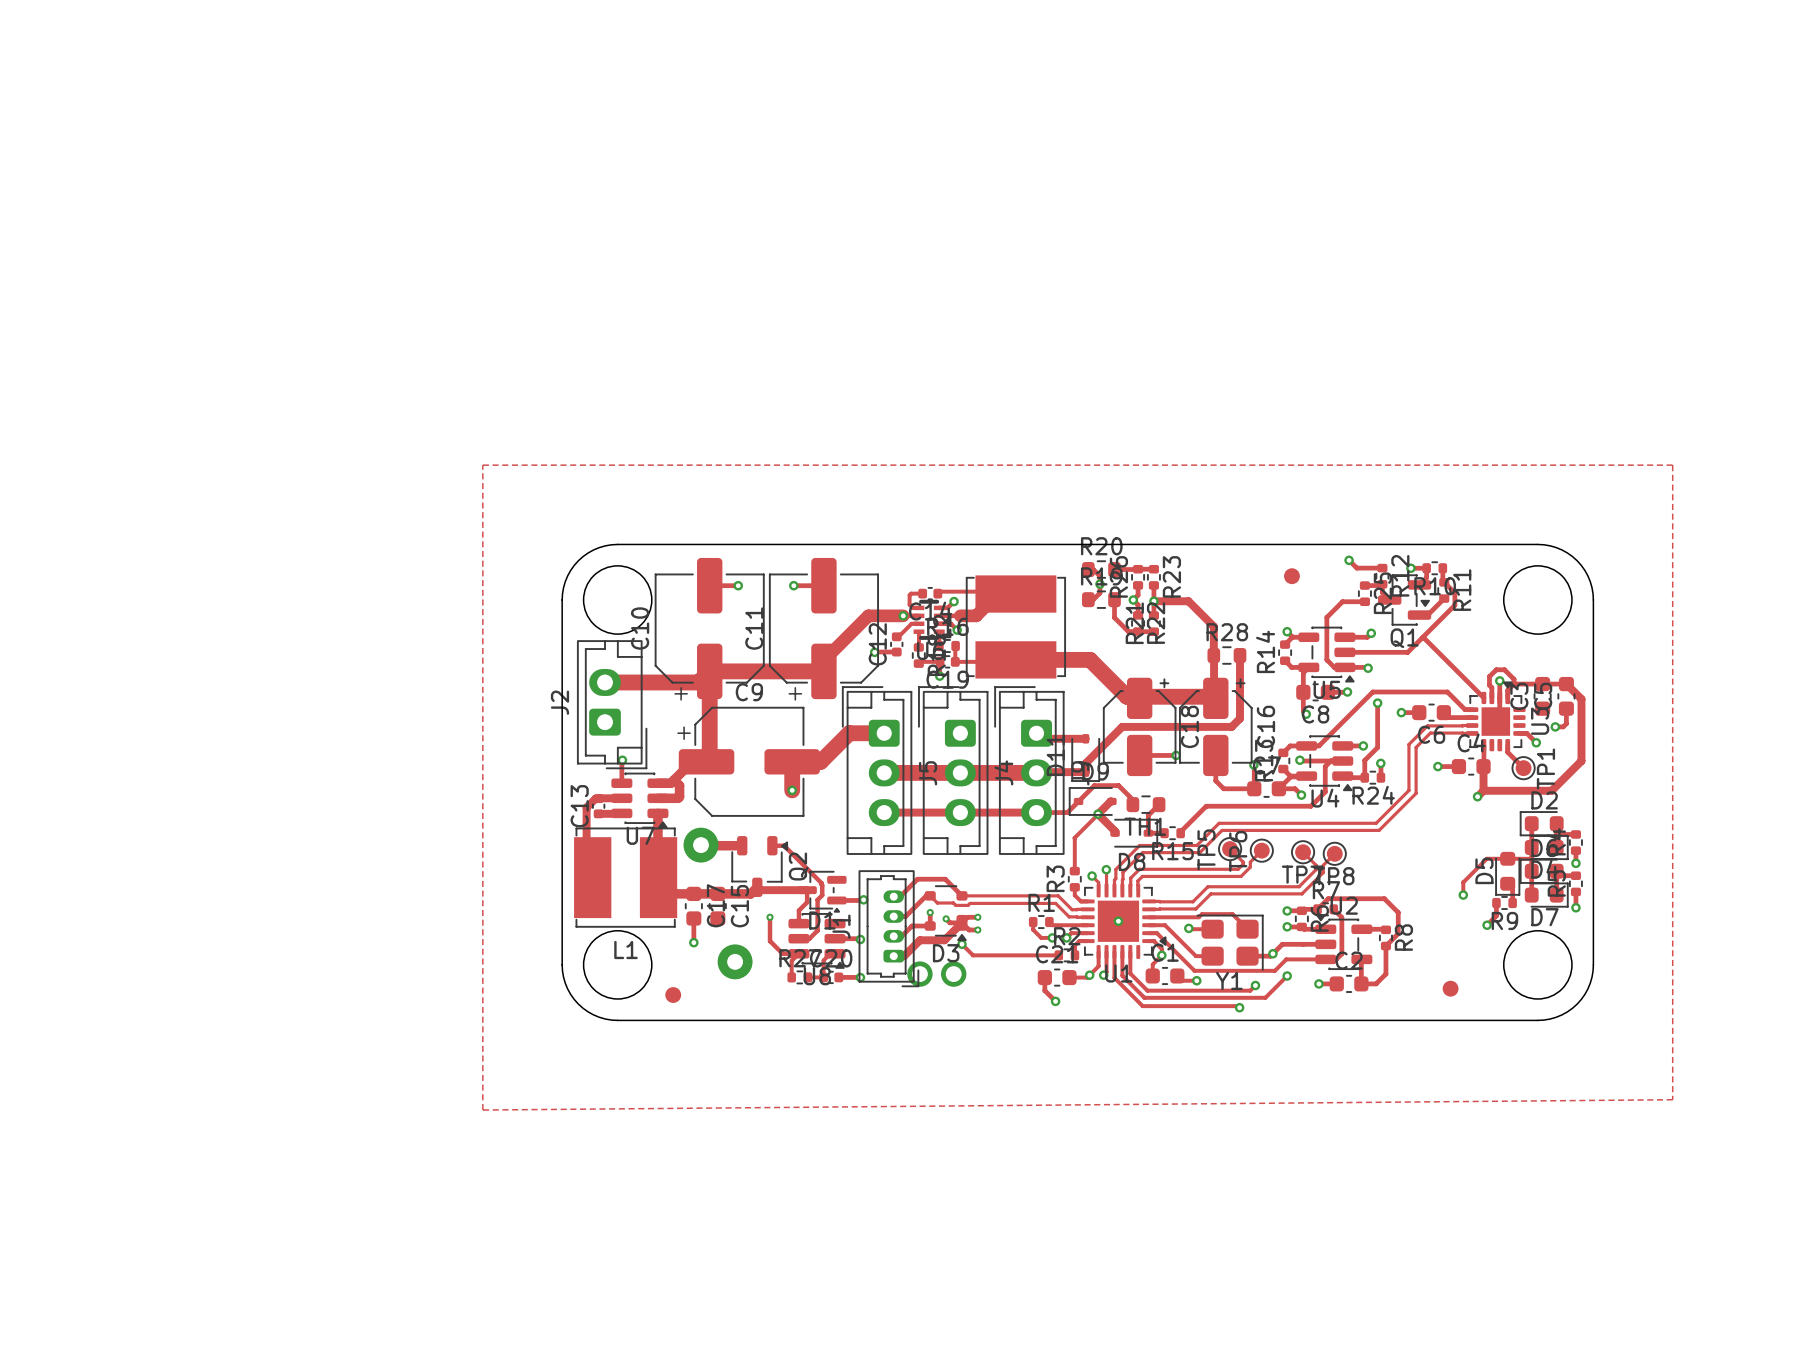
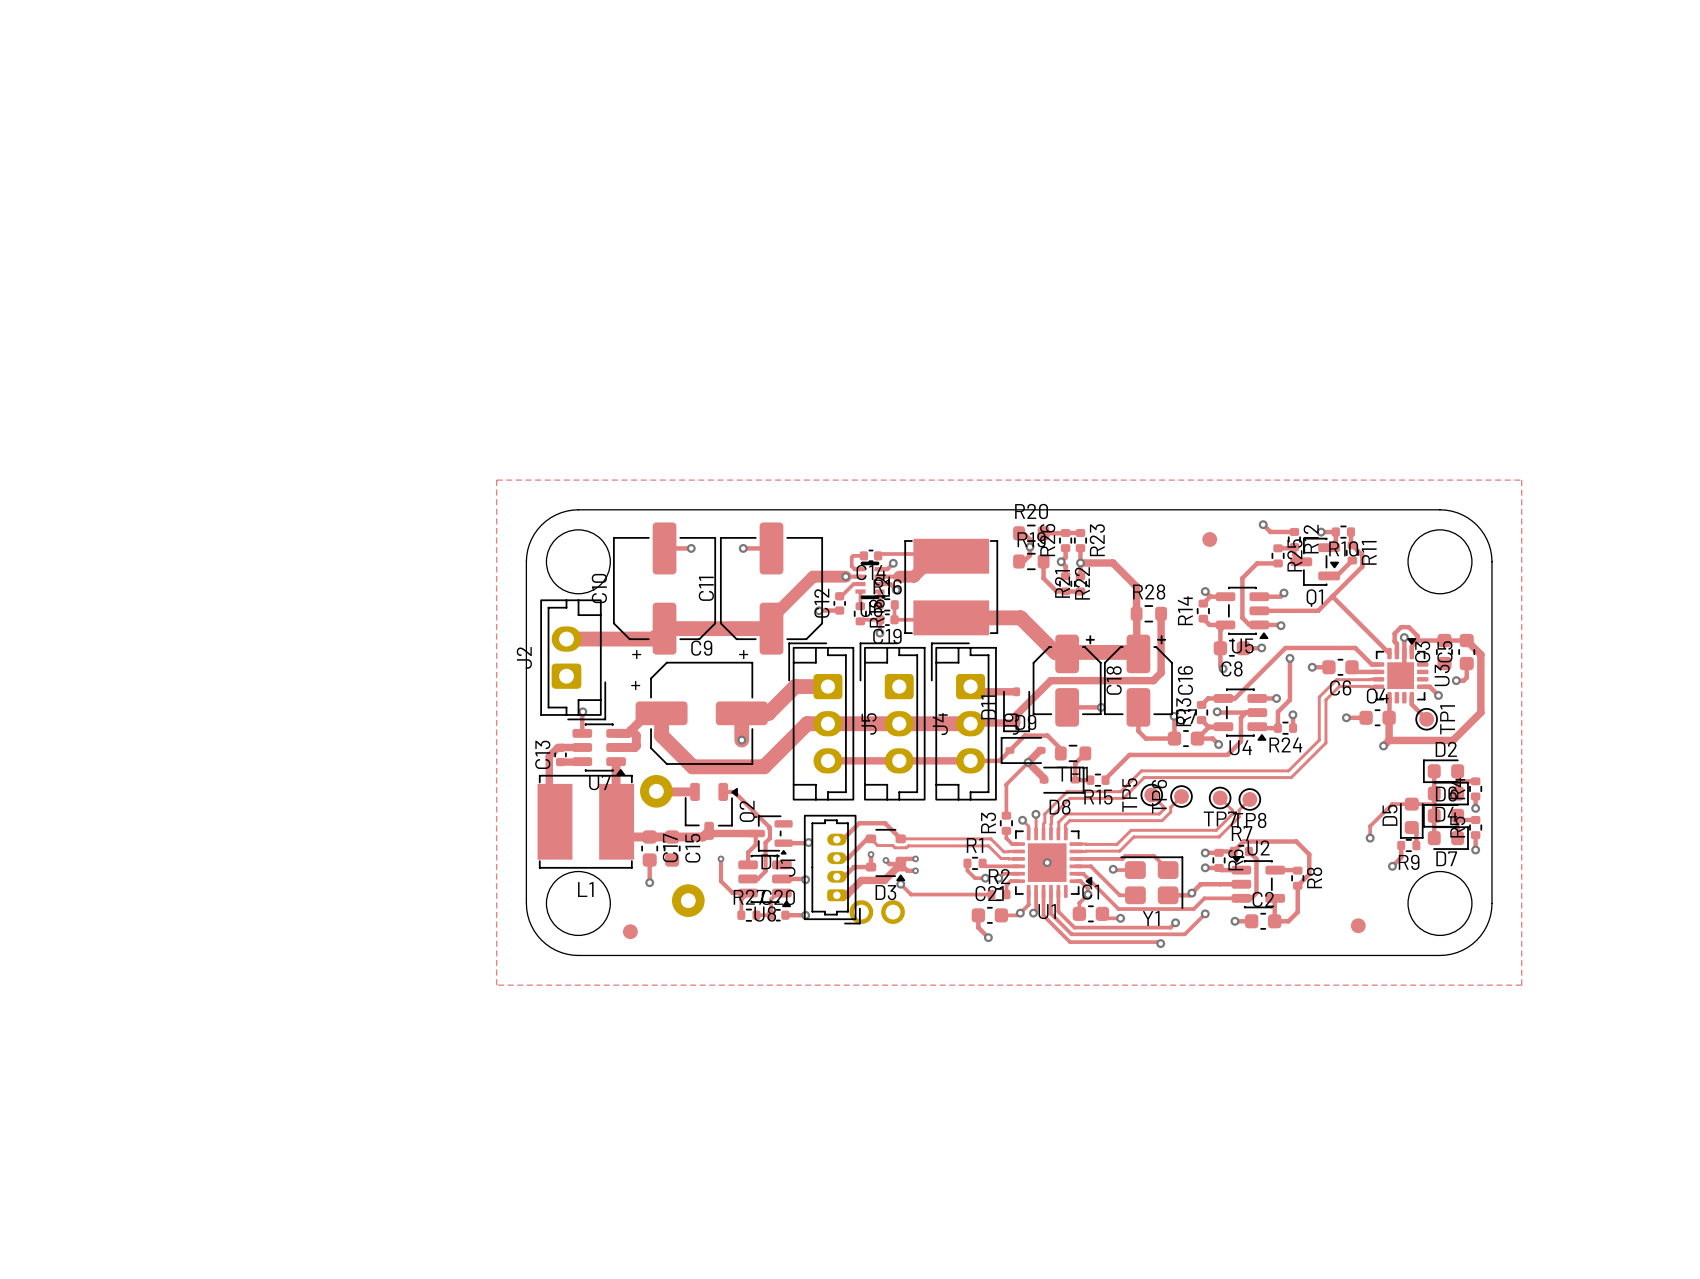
zone outline: (482, 465) (1672, 465) (1672, 1099) (482, 1110) (482, 465) -> (496, 480) (496, 985) (1521, 985) (1521, 480) (496, 480)
track: (709, 671) (709, 758) -> none
track: none -> (661, 713) (661, 735) (692, 766) (764, 766) (807, 723) (827, 723)

